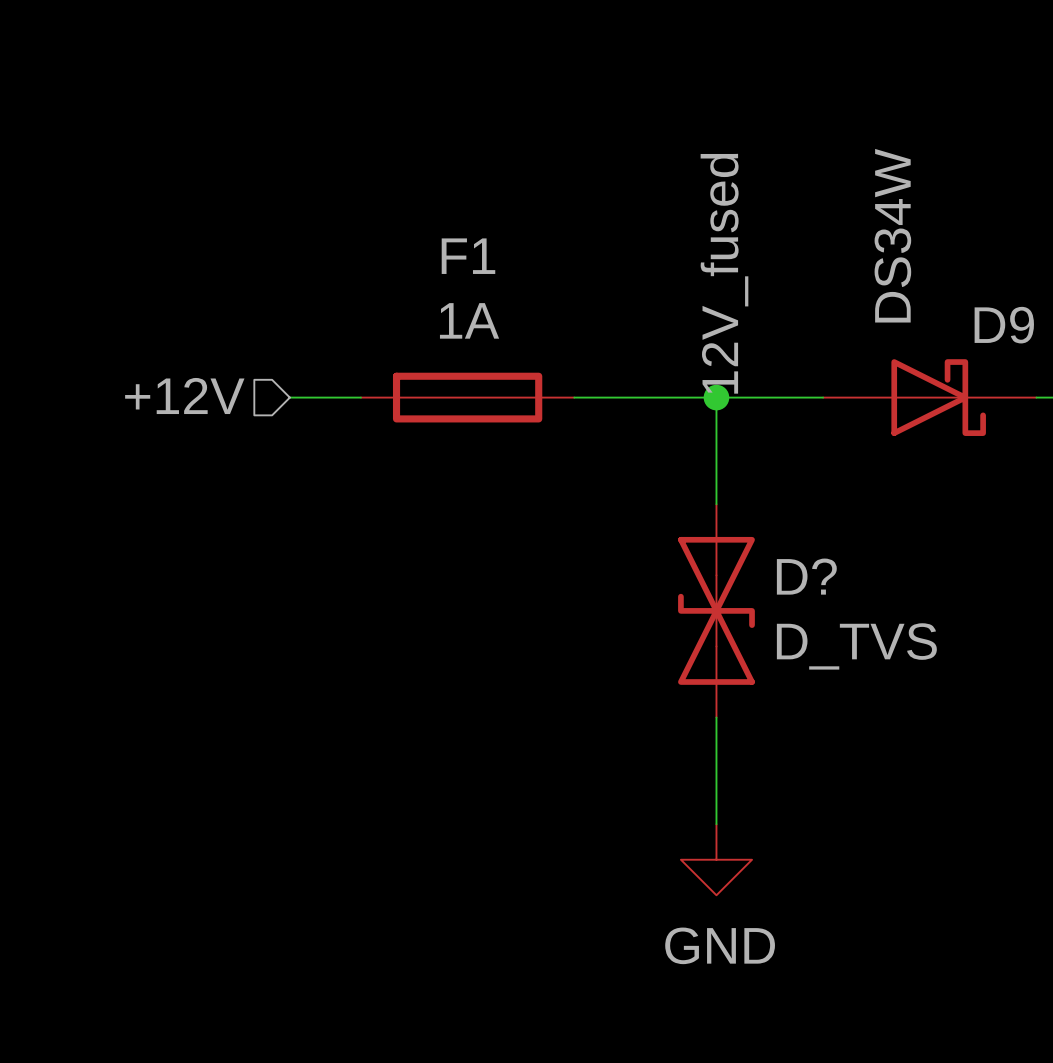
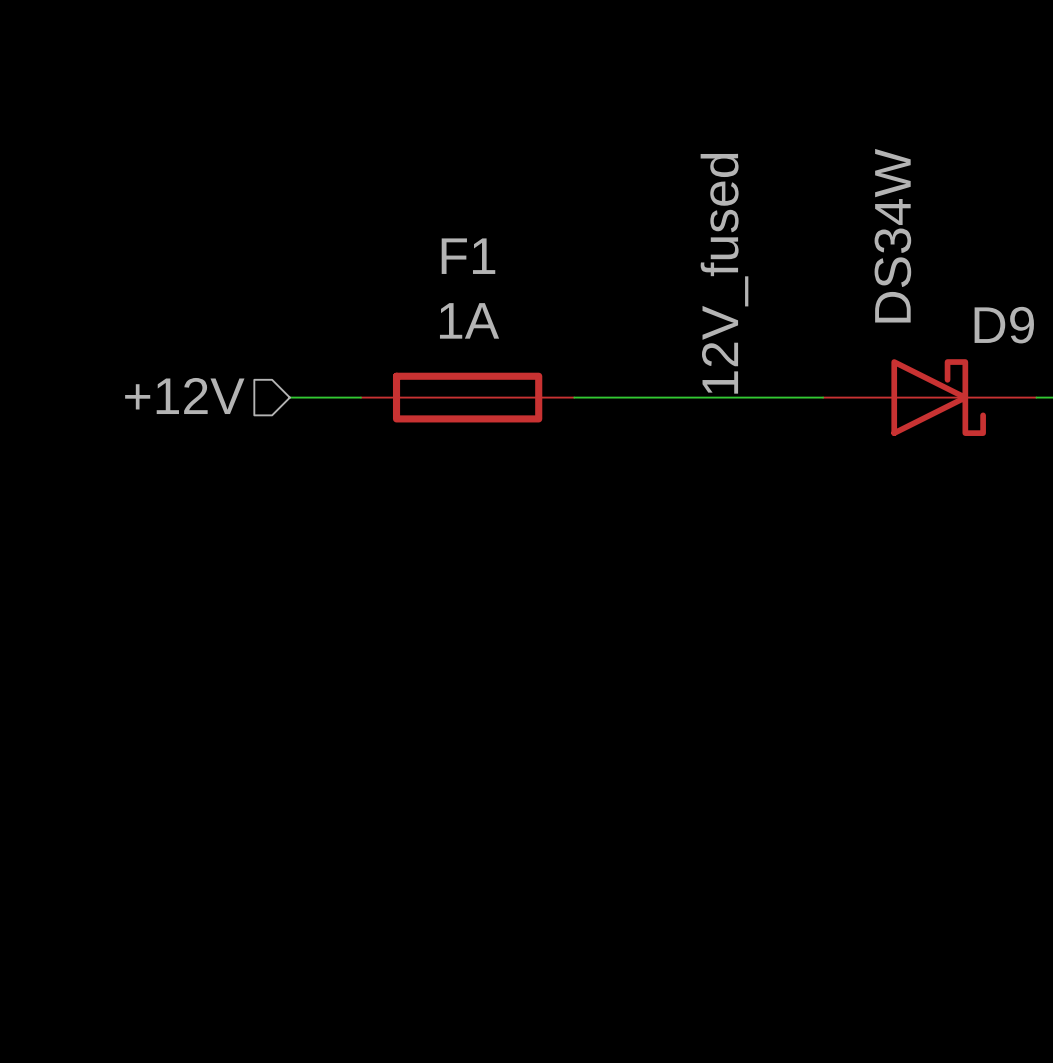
wire: (716, 397) (716, 504) -> none
junction: (716, 397) -> none
D?: D_TVS (716, 610) -> none
wire: (716, 717) (716, 824) -> none
power symbol: GND (716, 859) -> none

